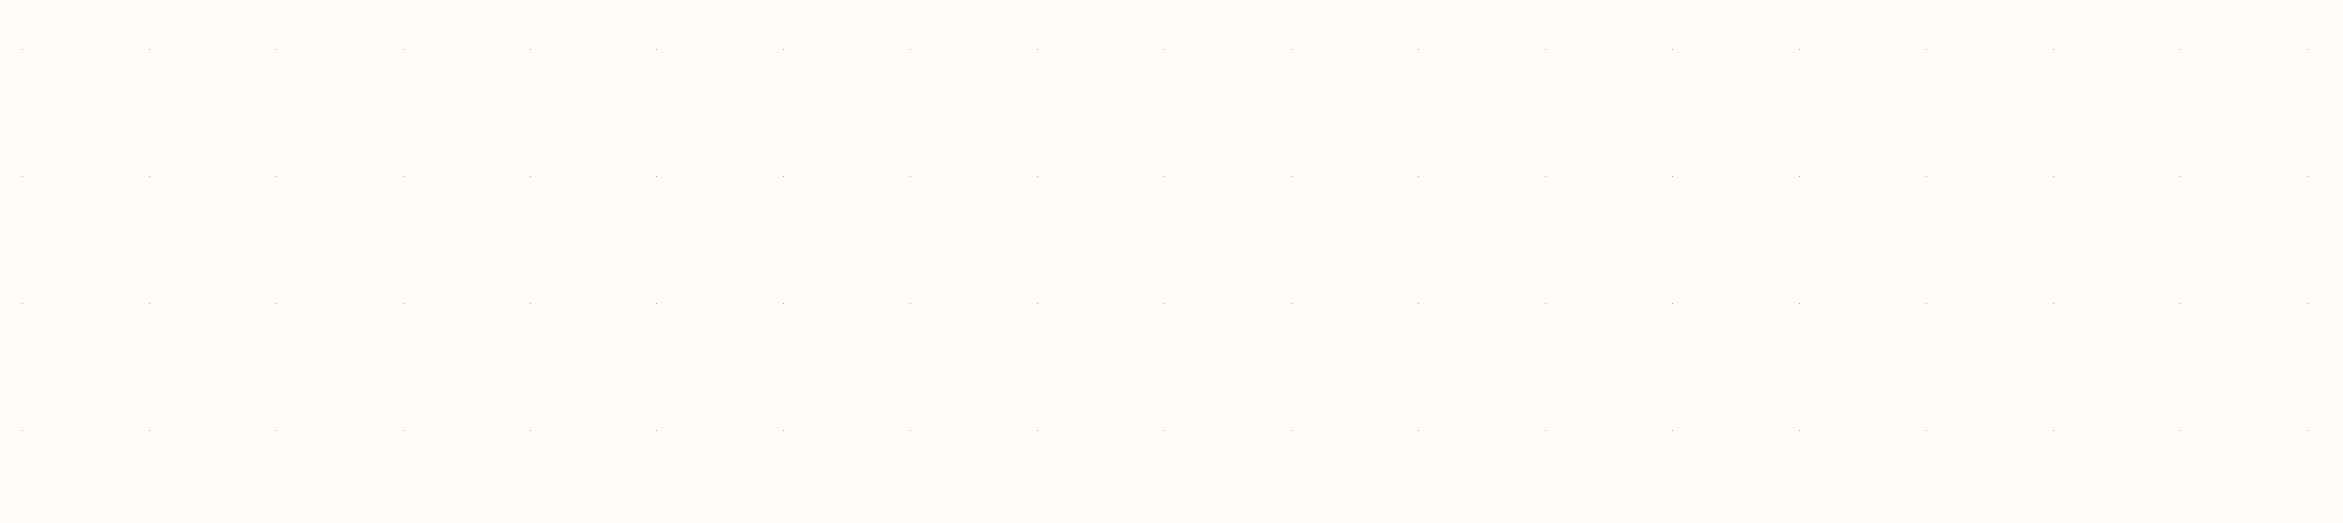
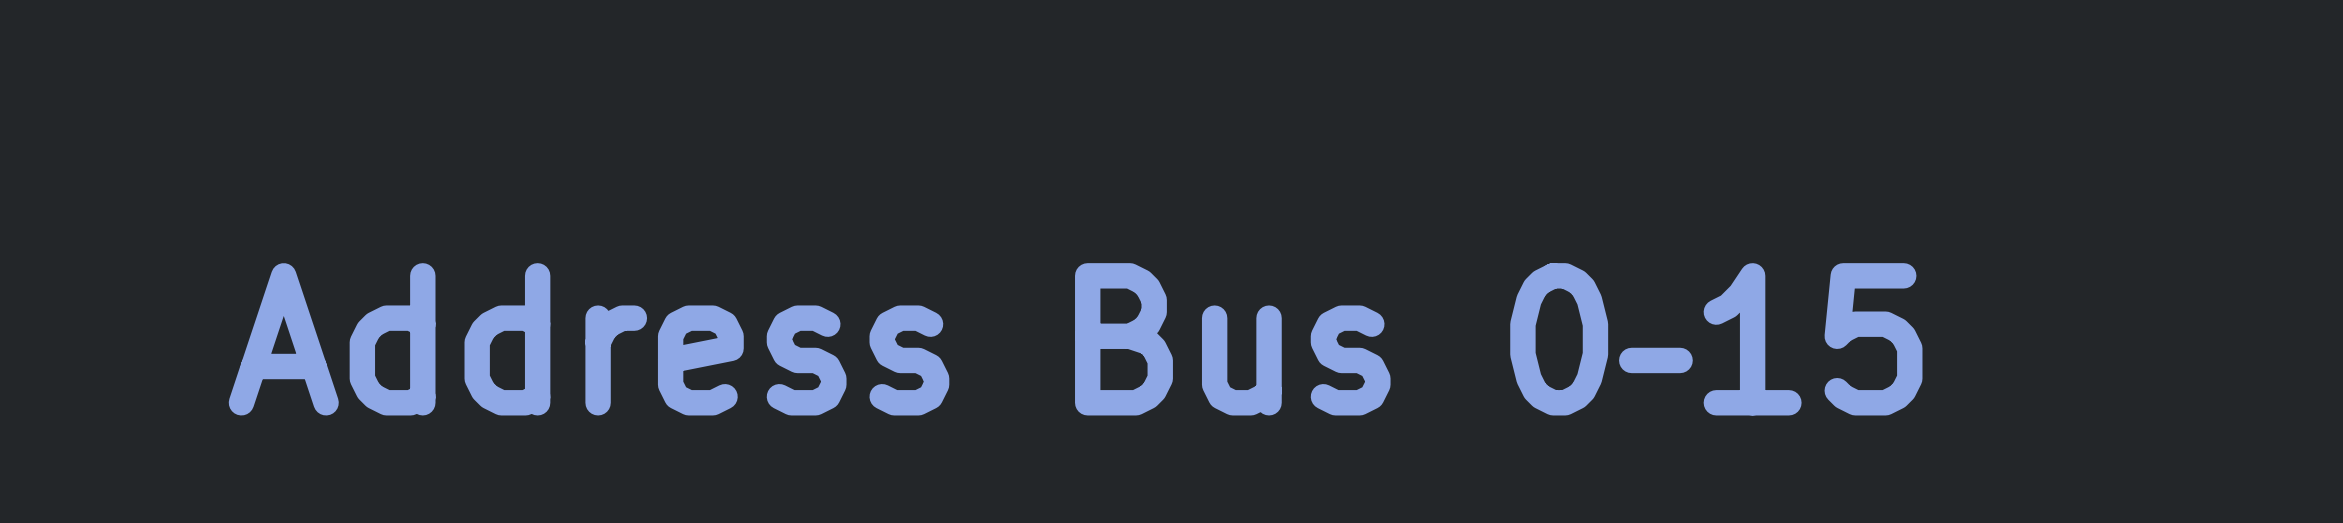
text: none -> Address Bus 0–15 (1075, 339)

